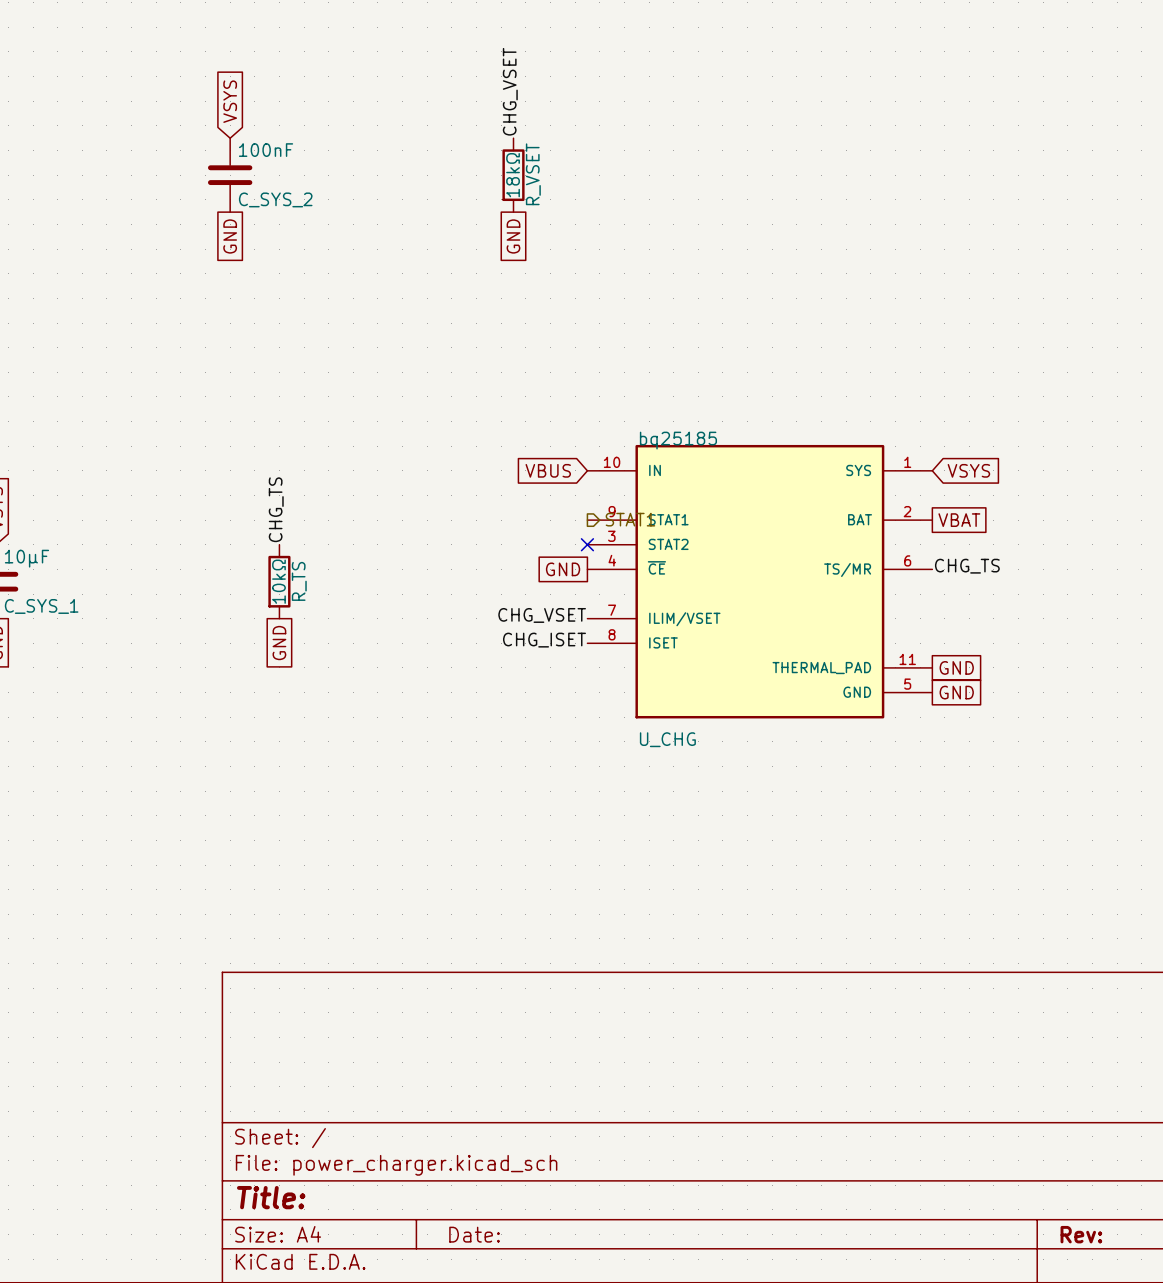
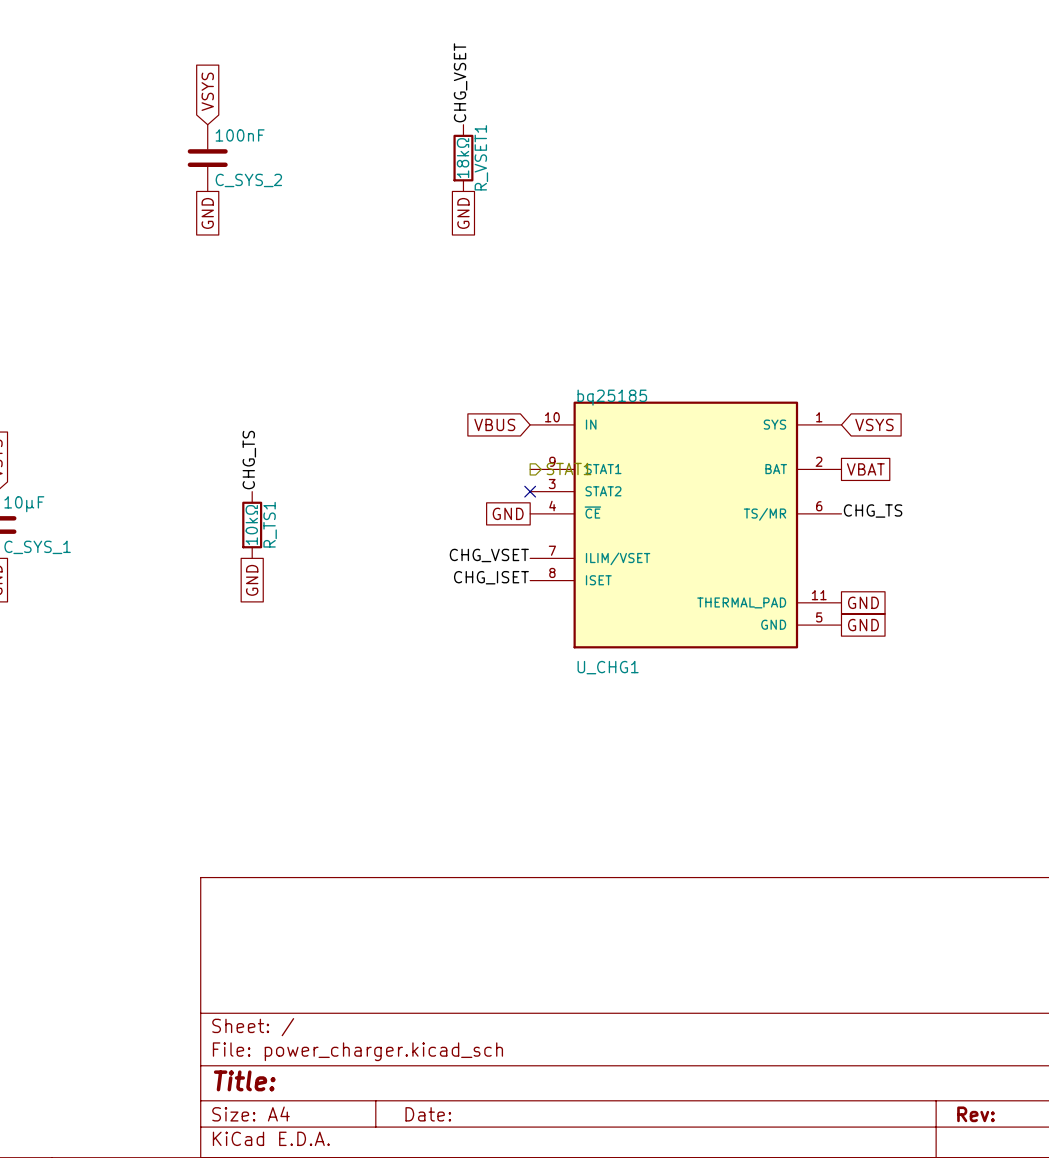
R_VSET name: R_VSET (533, 174) -> R_VSET1 (481, 157)
R_TS name: R_TS (299, 581) -> R_TS1 (270, 524)
U_CHG name: U_CHG (667, 739) -> U_CHG1 (608, 667)

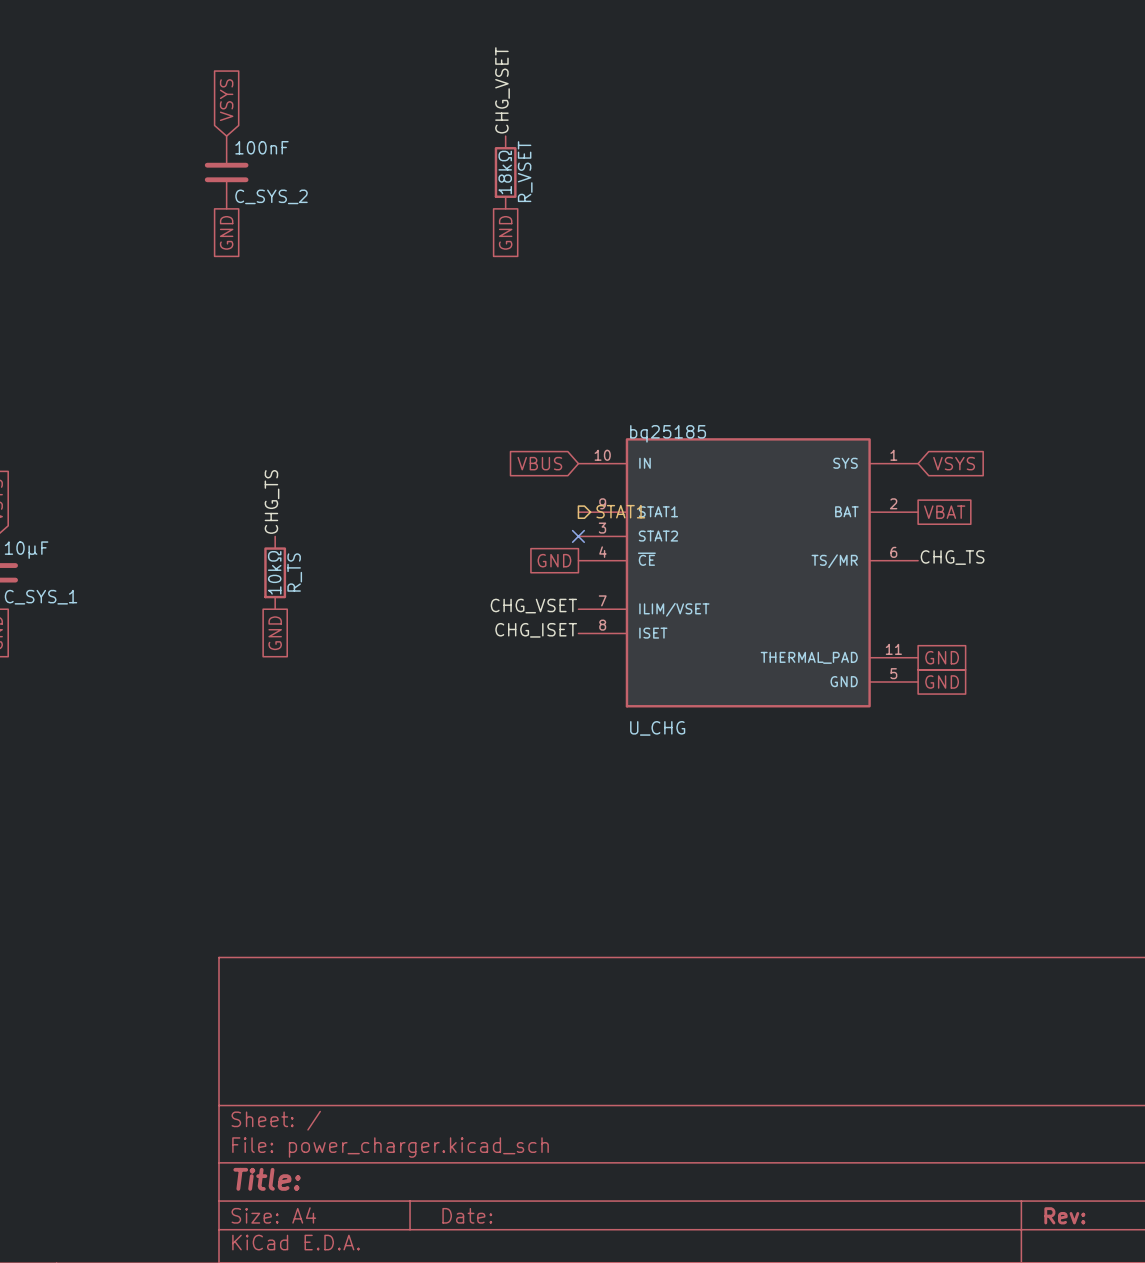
R_VSET1 name: R_VSET1 (481, 157) -> R_VSET (525, 171)
R_TS1 name: R_TS1 (270, 524) -> R_TS (294, 572)
U_CHG1 name: U_CHG1 (608, 667) -> U_CHG (657, 728)

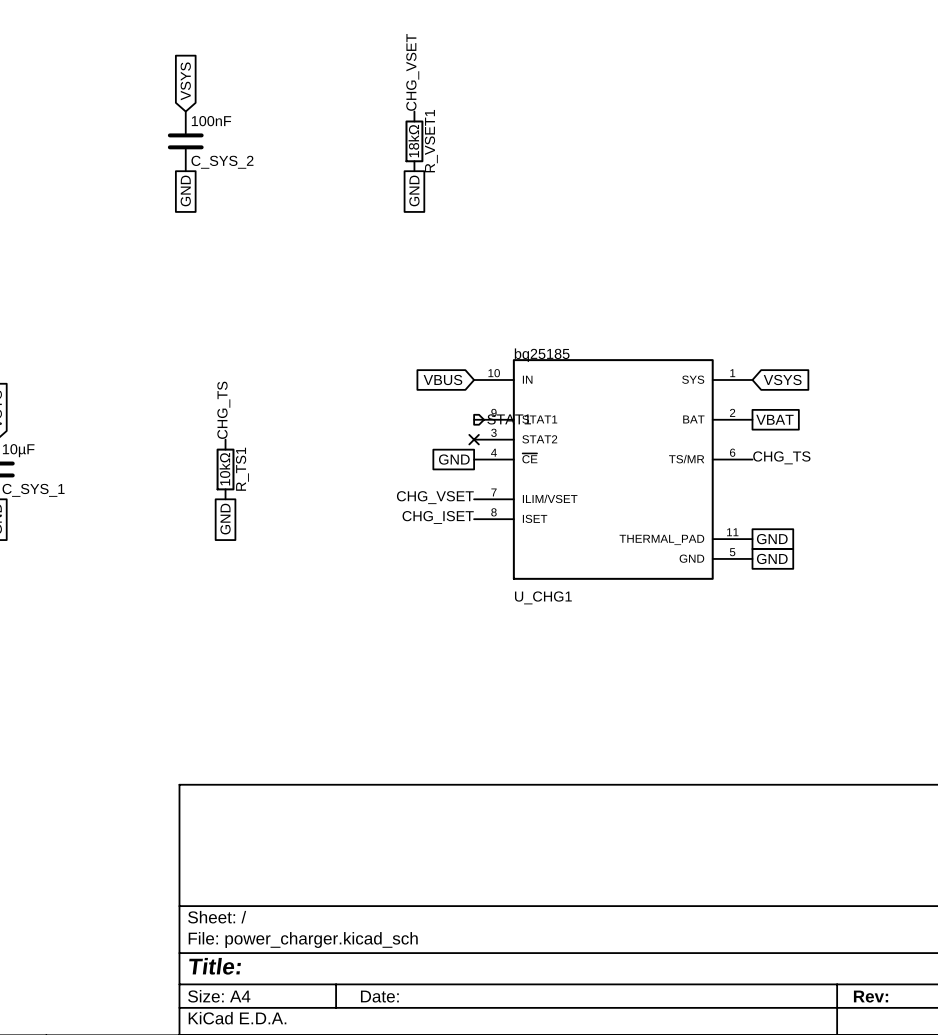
R_VSET name: R_VSET (525, 171) -> R_VSET1 (431, 141)
R_TS name: R_TS (294, 572) -> R_TS1 (242, 469)
U_CHG name: U_CHG (657, 728) -> U_CHG1 (543, 597)

